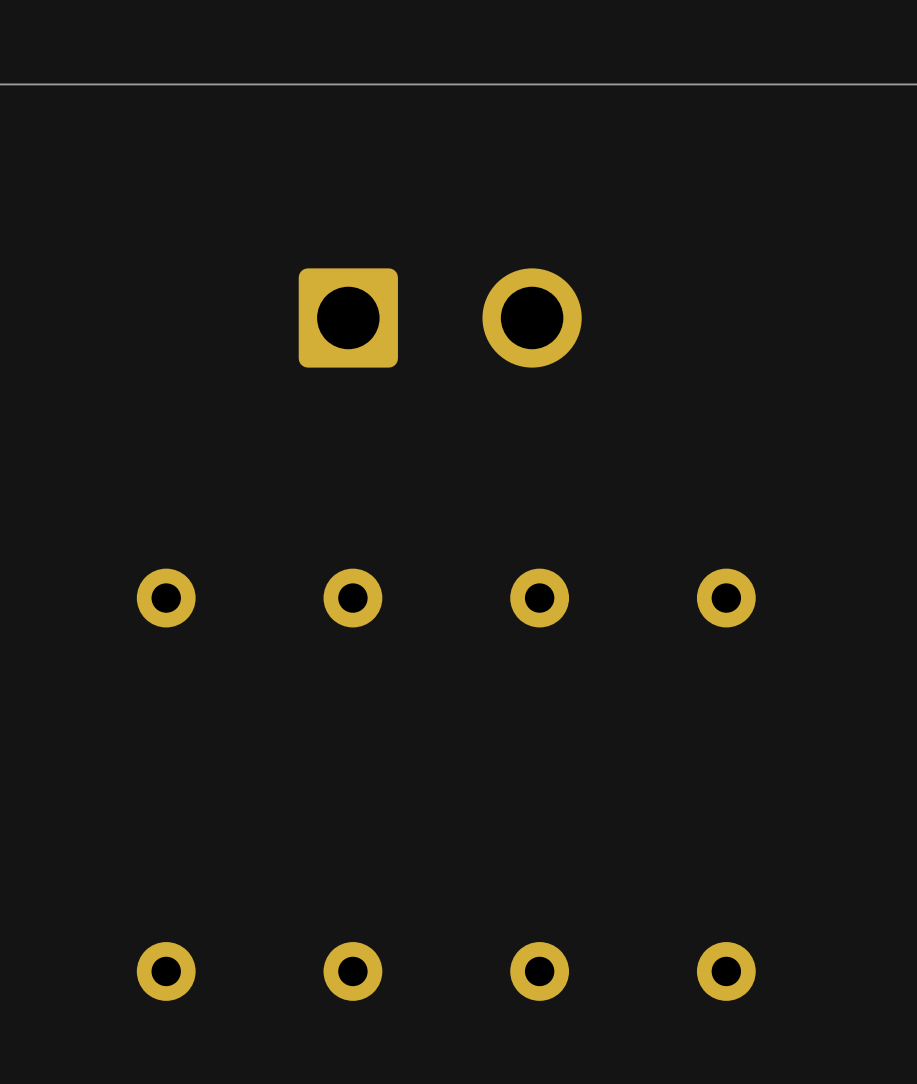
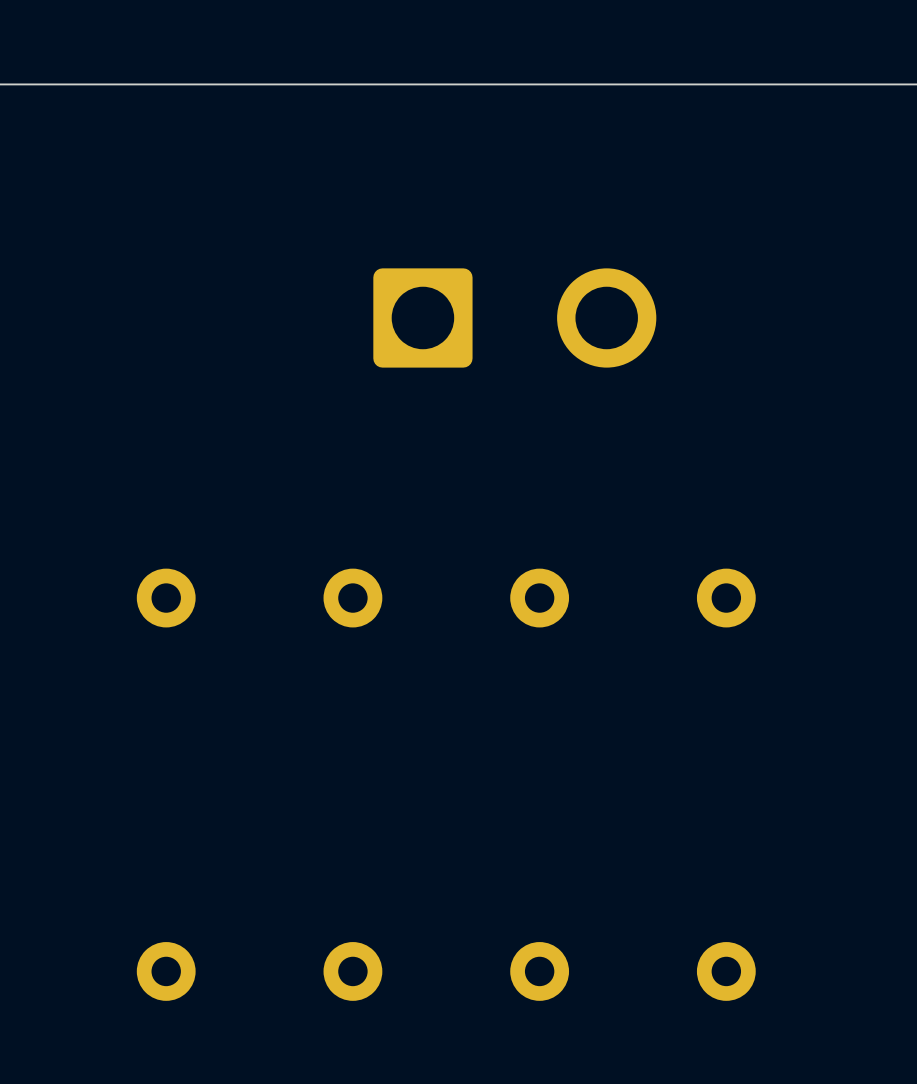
part position: (440, 317) -> (514, 317)

